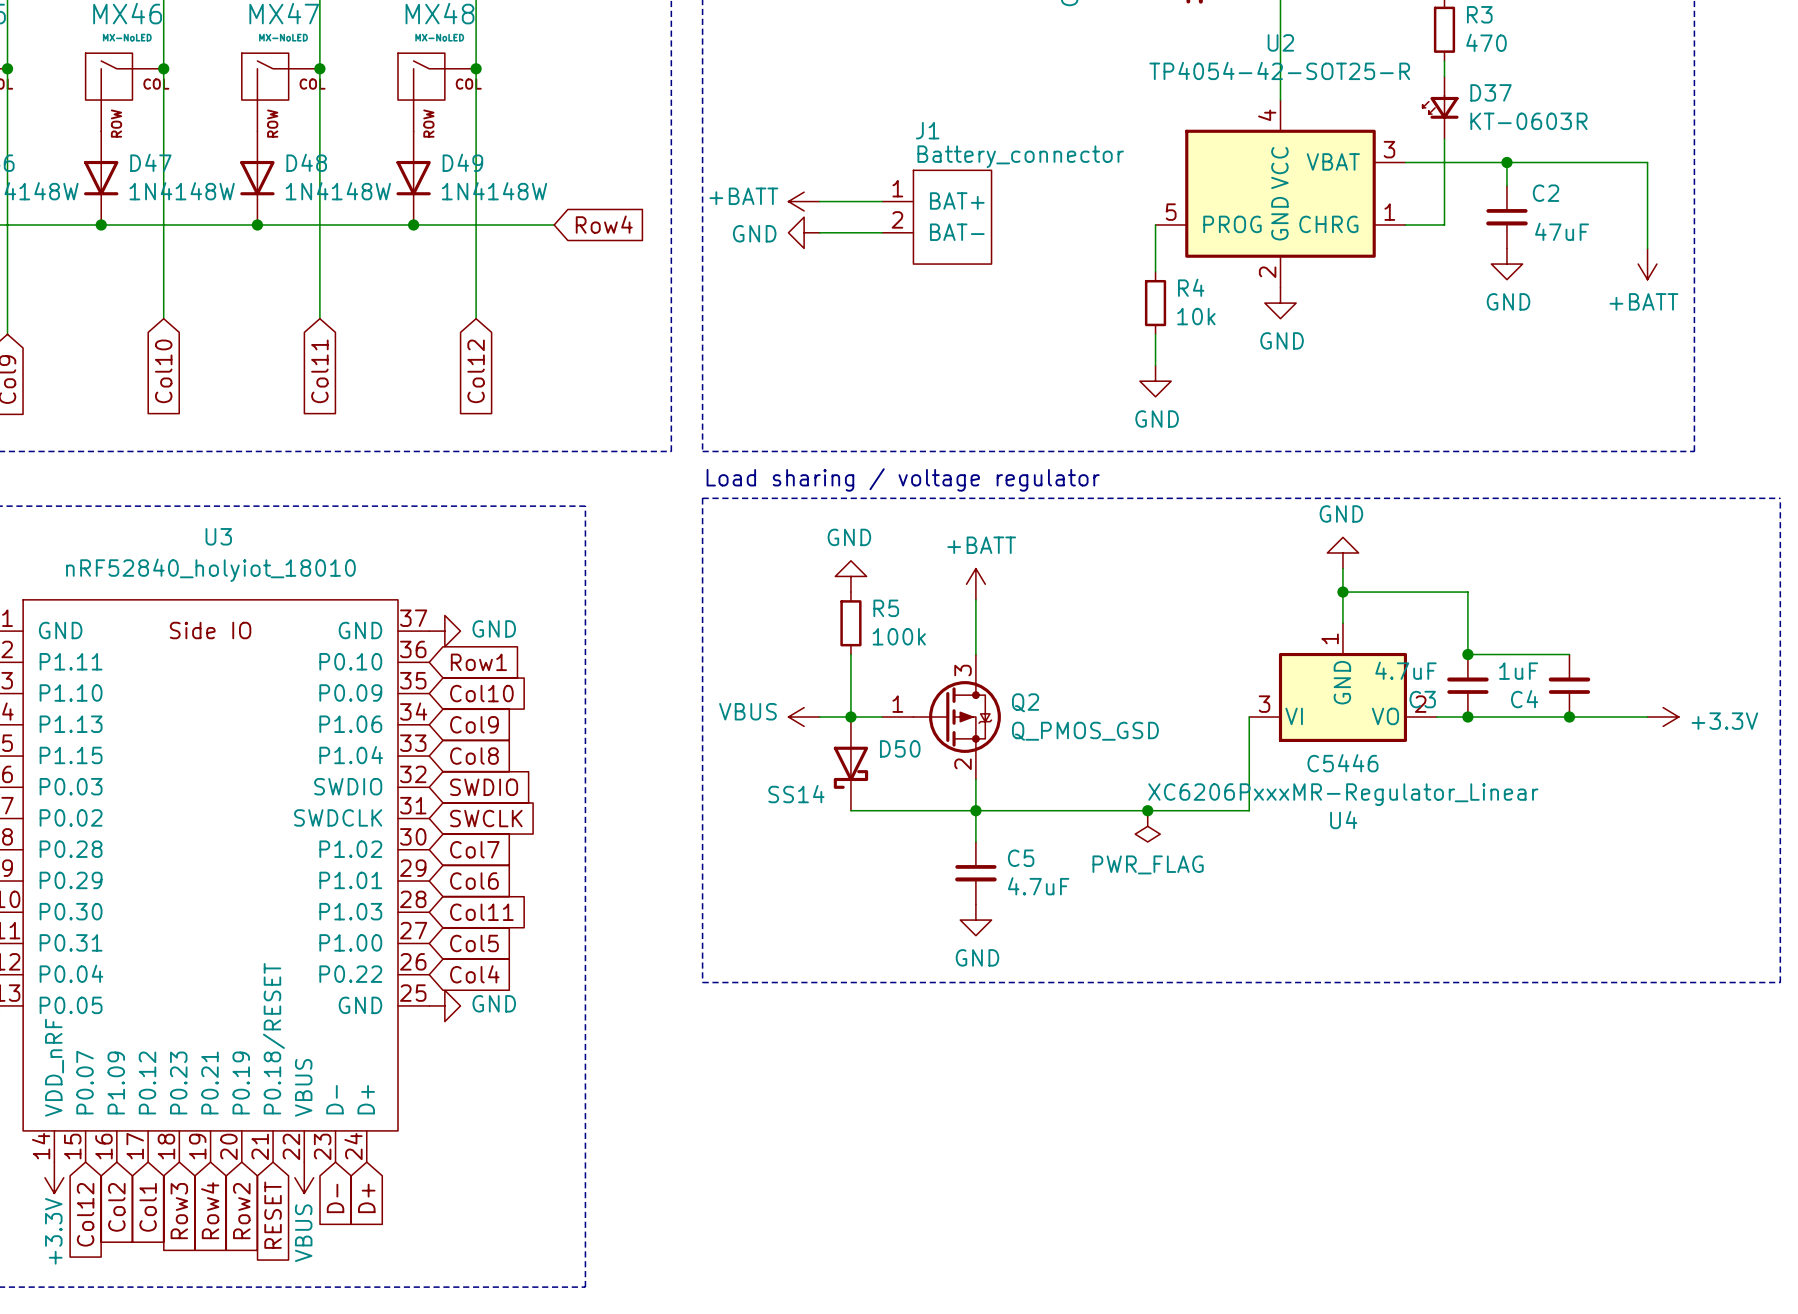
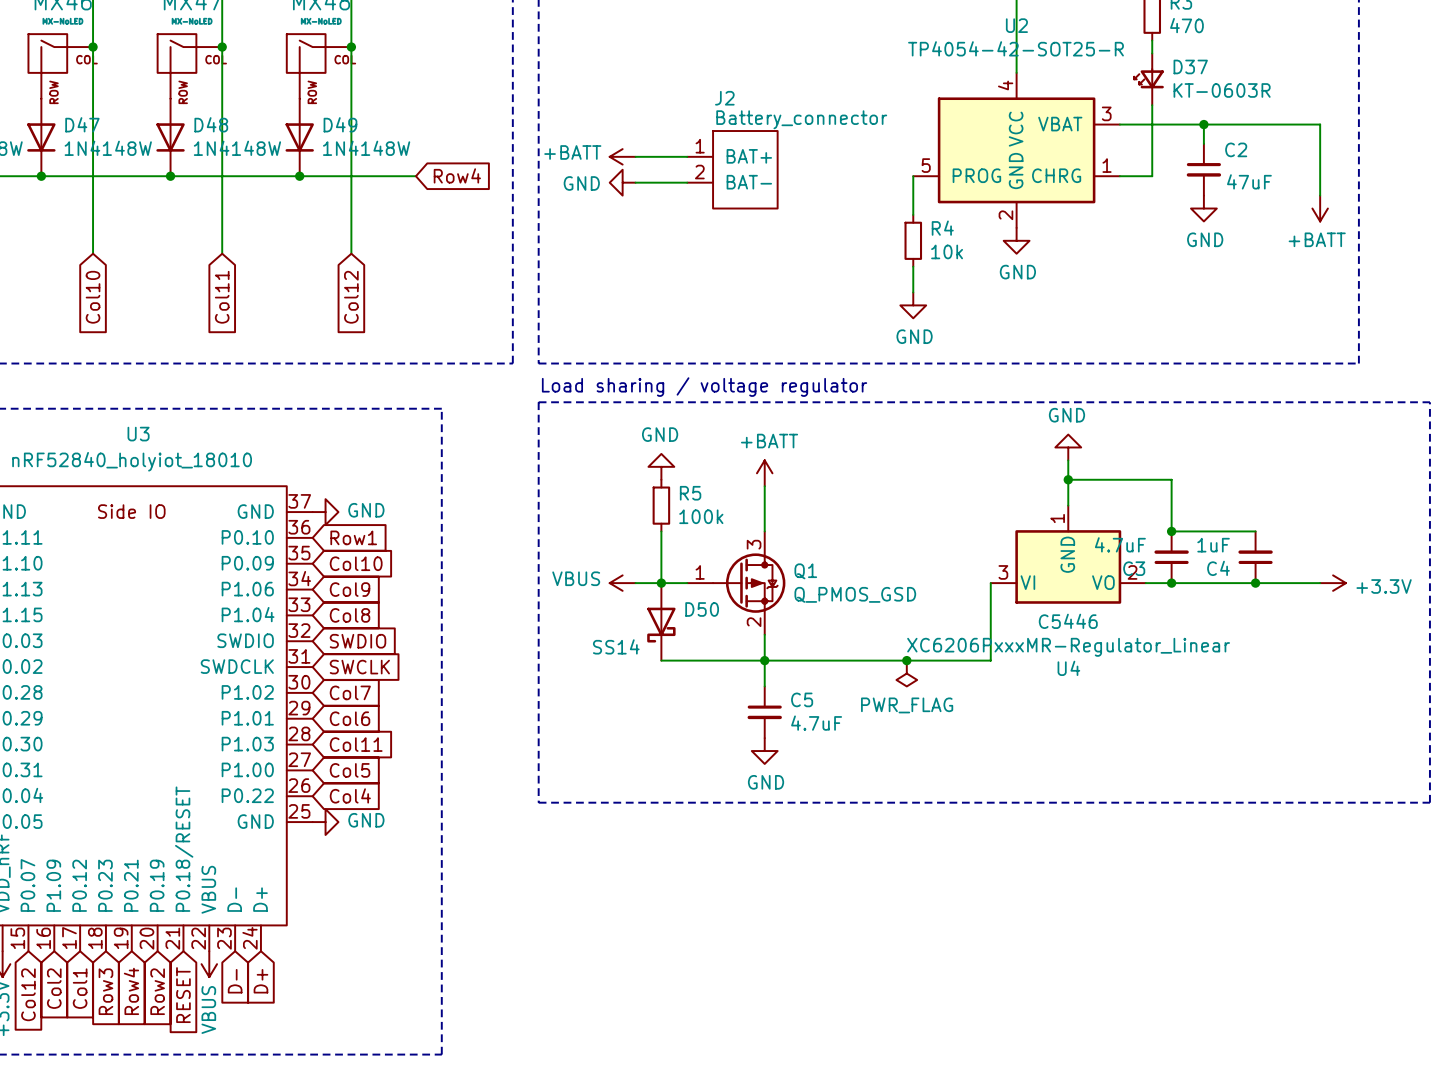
J1 name: J1 (927, 130) -> J2 (724, 98)
Q2 name: Q2 (1025, 702) -> Q1 (805, 571)

